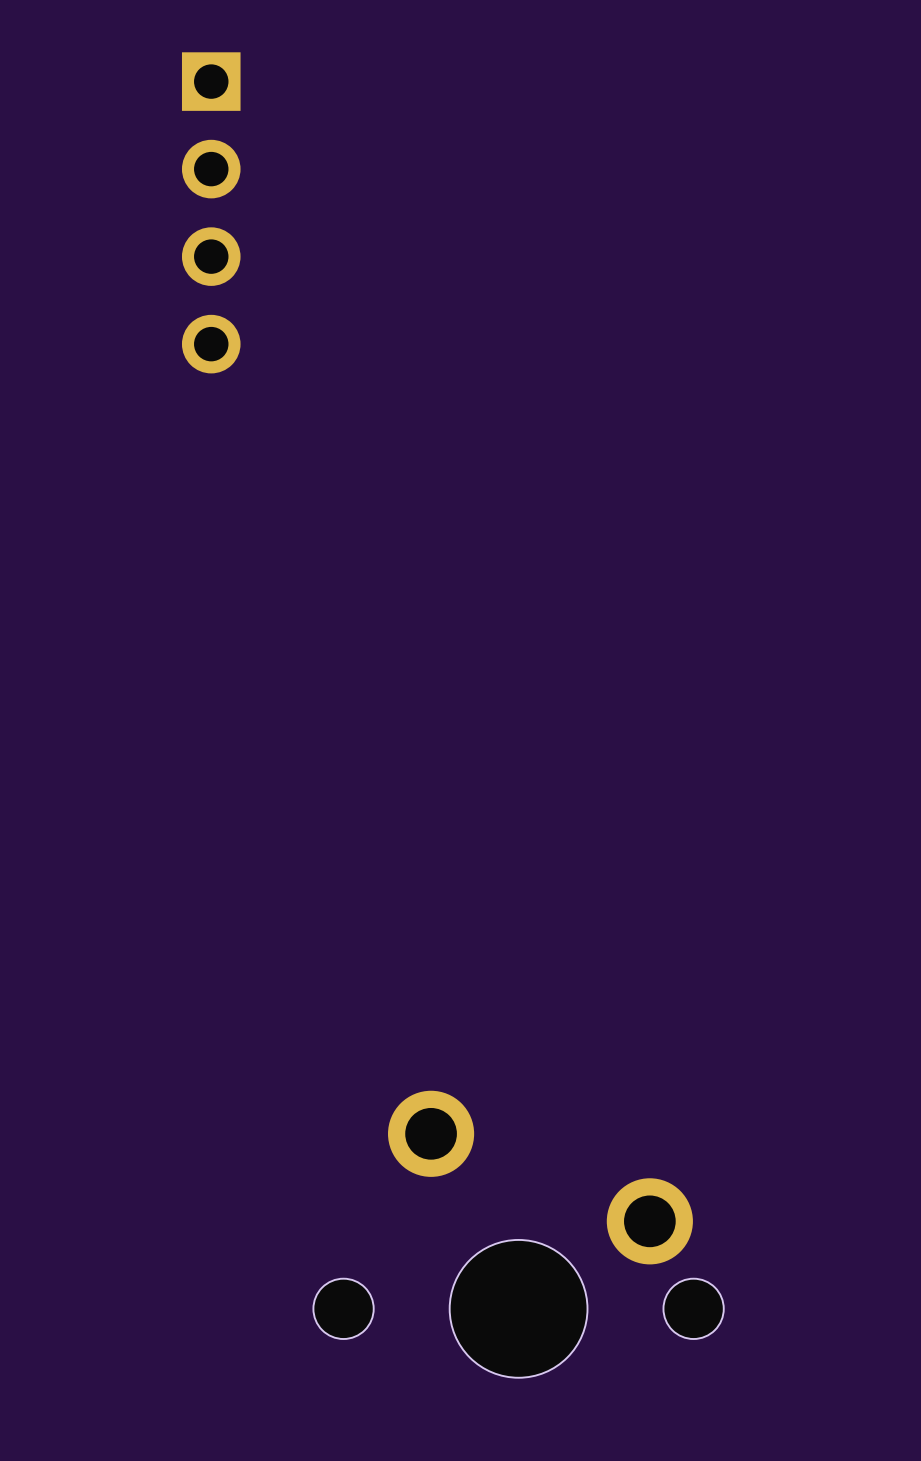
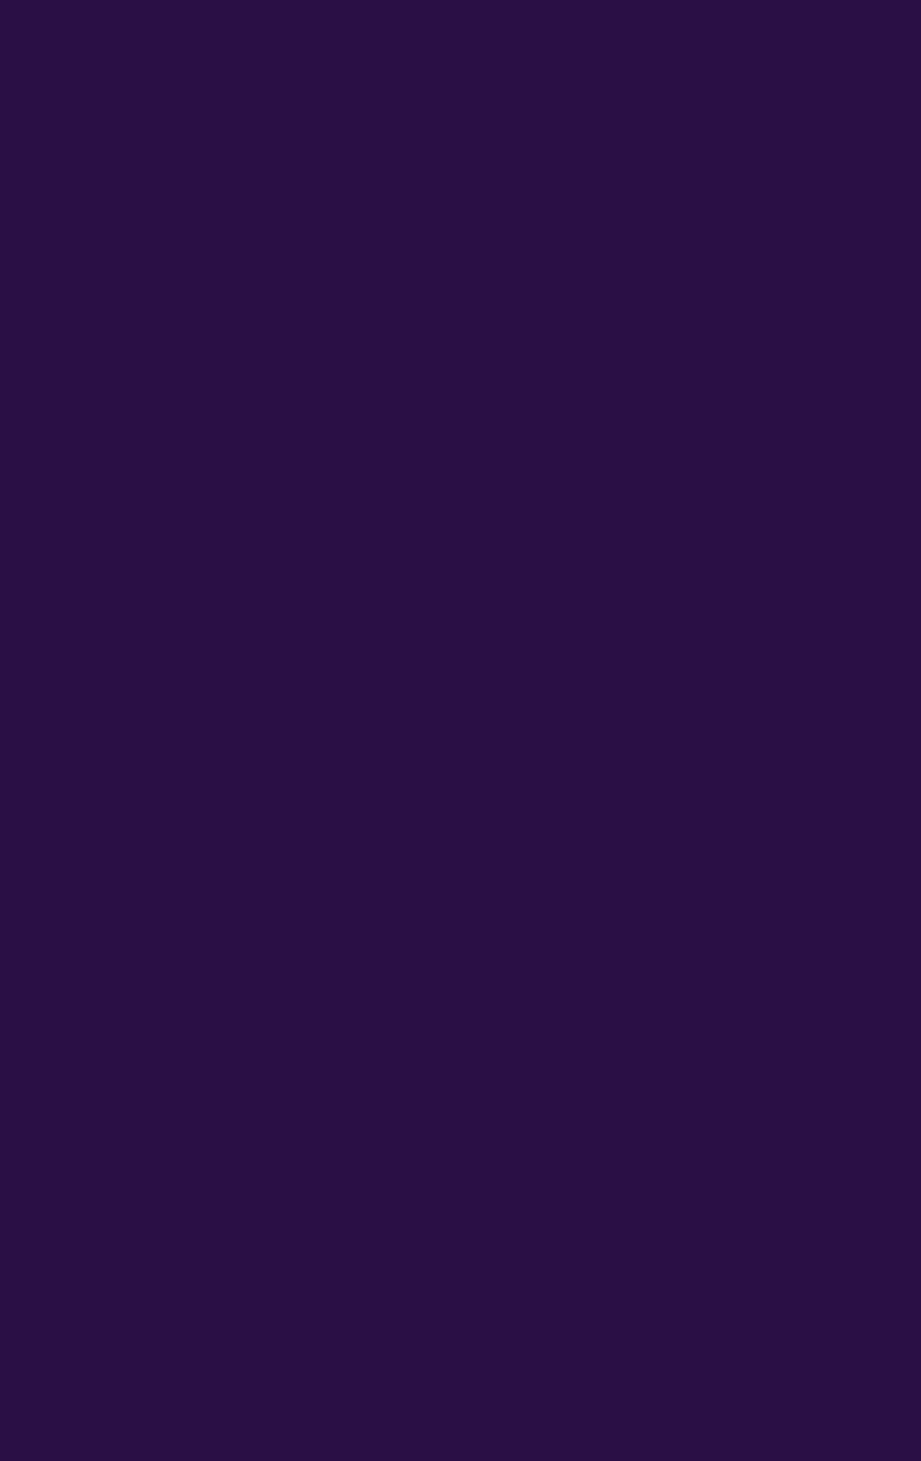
part: (211, 212) -> none
part: (518, 1234) -> none

